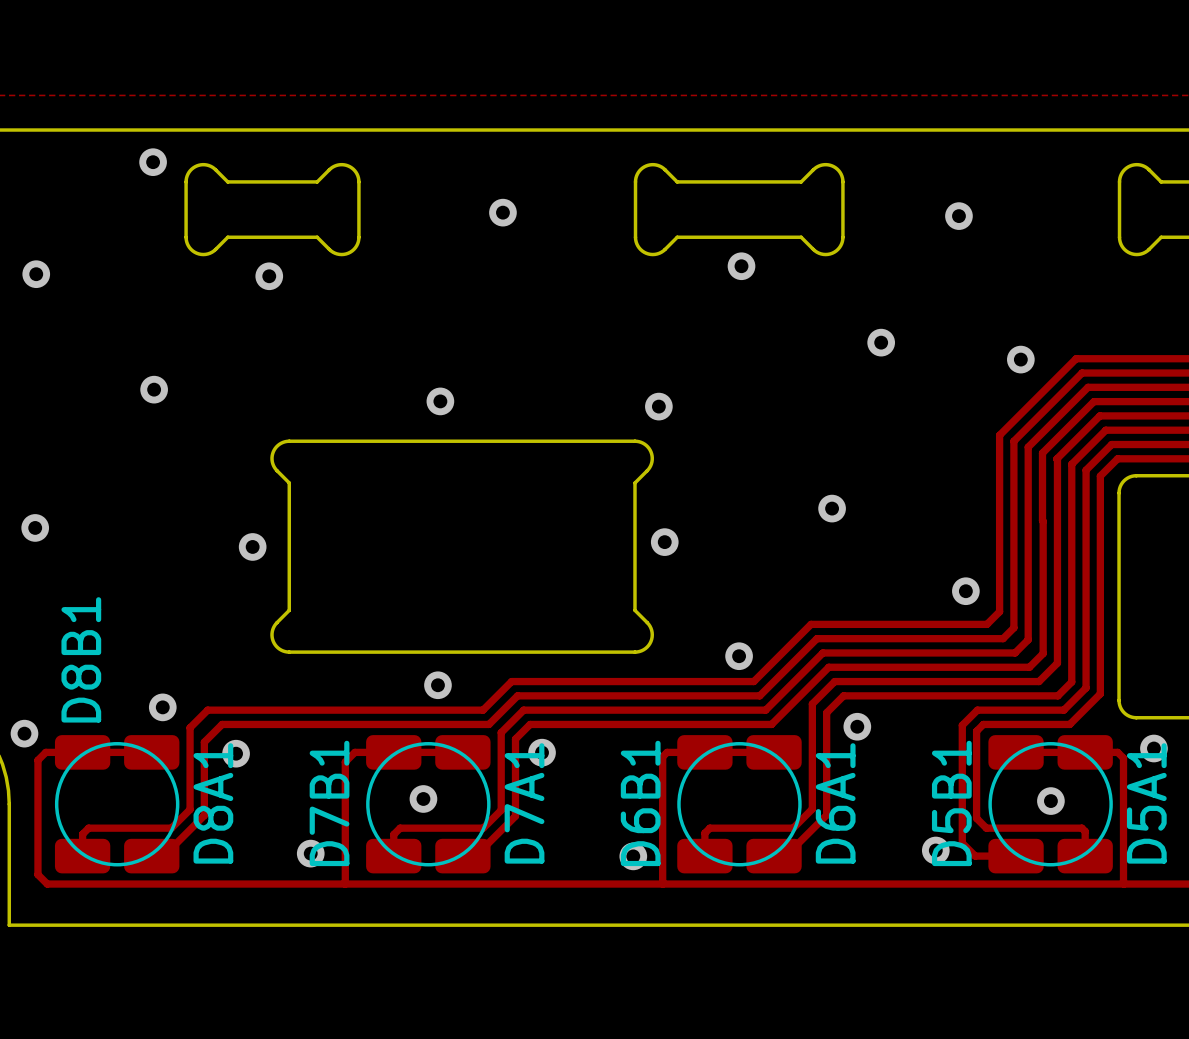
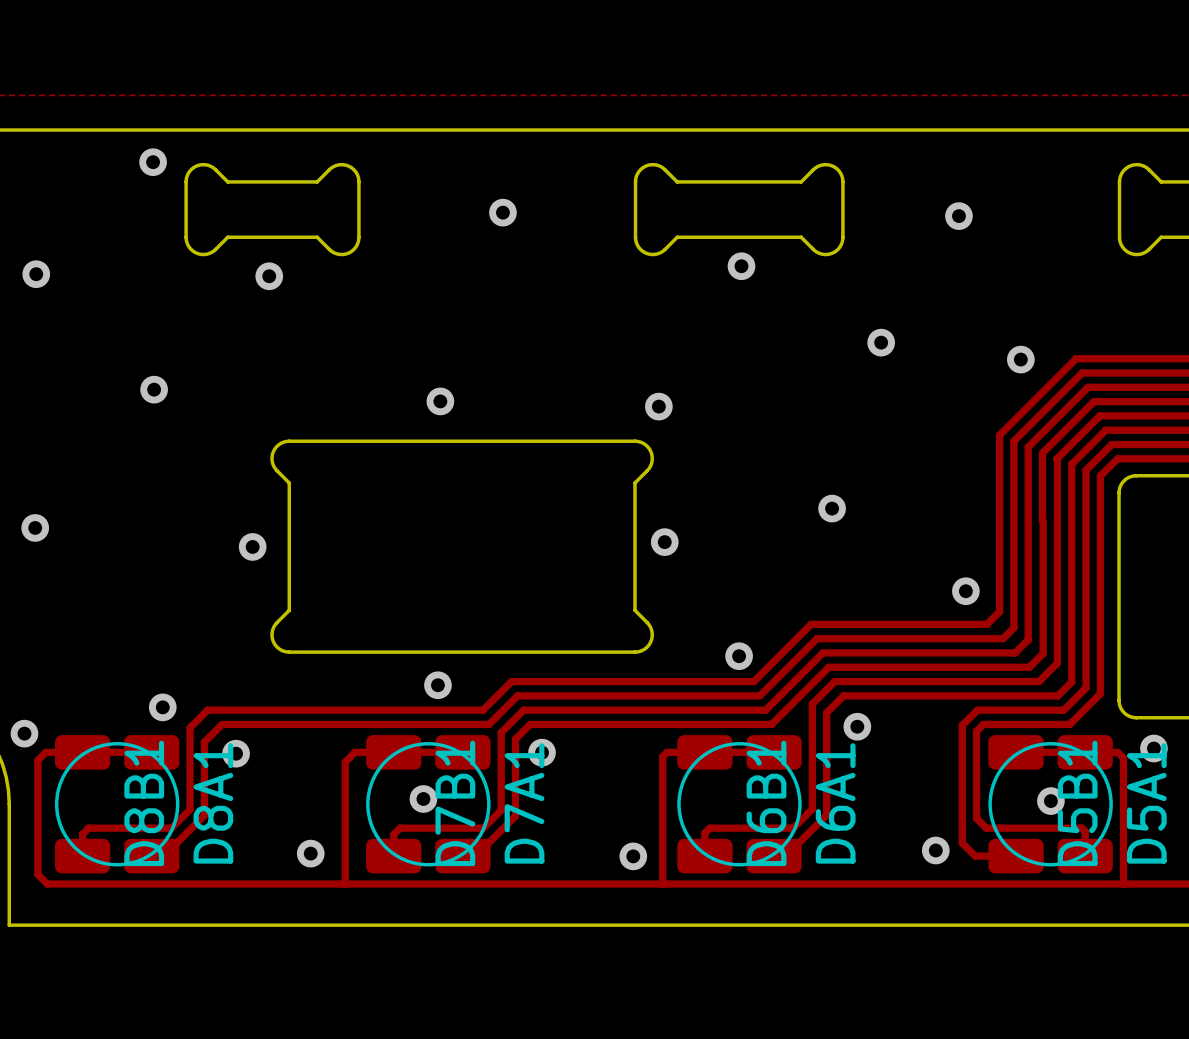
D8B1 name position: D8B1 (81, 659) -> D8B1 (144, 803)
D7B1 name position: D7B1 (329, 803) -> D7B1 (455, 803)
D6B1 name position: D6B1 (640, 803) -> D6B1 (766, 803)
D5B1 name position: D5B1 (951, 803) -> D5B1 (1077, 803)

